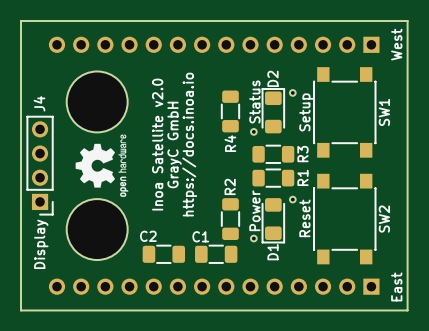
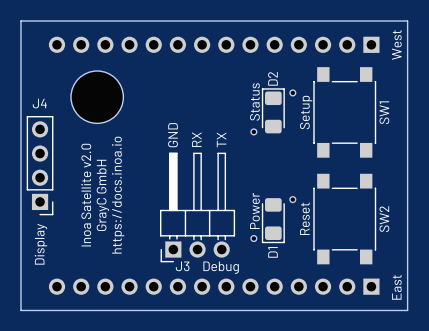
part footprint: [66, 71, 128, 133] -> [70, 70, 124, 124]
J4 name rotation: 0° (39, 103) -> 90° clockwise (39, 103)
R4: (230, 111) -> none
drawing: [75, 134, 129, 197] -> none
text: none -> GND (173, 135)
text: none -> RX (196, 139)
text: none -> TX (221, 140)
text position: Inoa Satellite v2.0 (157, 144) -> Inoa Satellite v2.0 (86, 195)
text position: https://docs.inoa.io (189, 144) -> https://docs.inoa.io (118, 195)
text position: GrayC GmbH (174, 145) -> GrayC GmbH (102, 195)
R3: (273, 154) -> none
R1: (273, 178) -> none
J3: none -> Debug (197, 207)
R2: (230, 219) -> none
part: (97, 229) -> none
C2: (163, 254) -> none
C1: (216, 254) -> none

